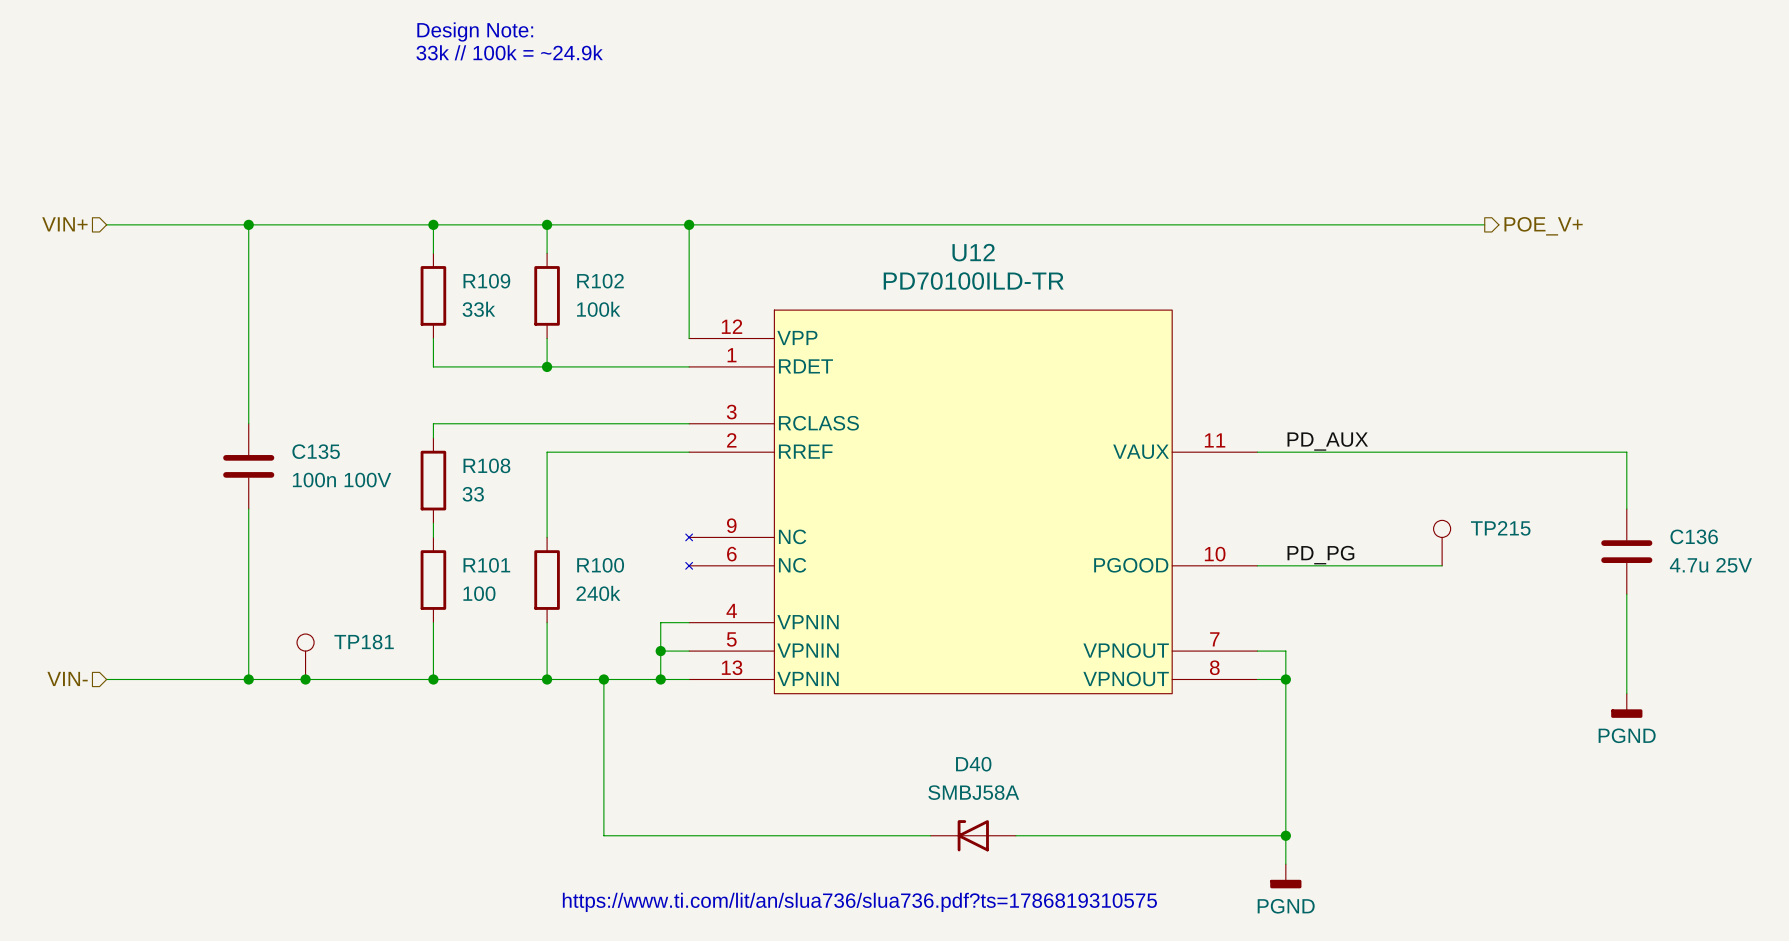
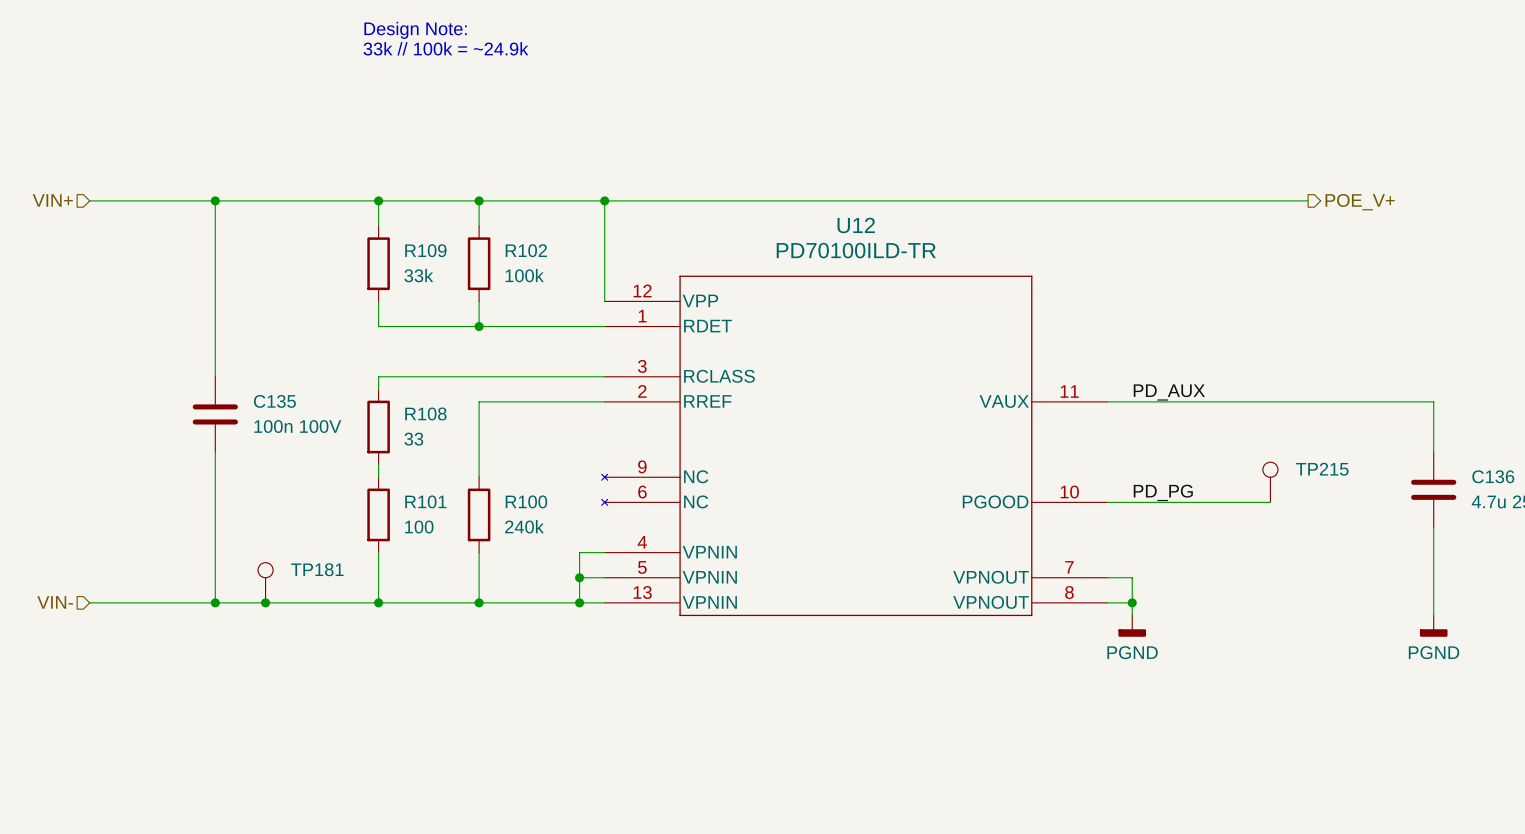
U12 symbol: [685, 310, 1258, 694] -> [601, 275, 1108, 617]
wire: (603, 679) (603, 835) (930, 835) -> none
junction: (603, 679) -> none
wire: (1285, 693) (1285, 864) -> none
D40: SMBJ58A (973, 835) -> none
wire: (1015, 835) (1285, 835) -> none
junction: (1285, 835) -> none
power symbol position: PGND (1285, 876) -> PGND (1132, 626)
text: https://www.ti.com/lit/an/slua736/slua736.pdf?ts=1786819310575 (859, 902) -> none

